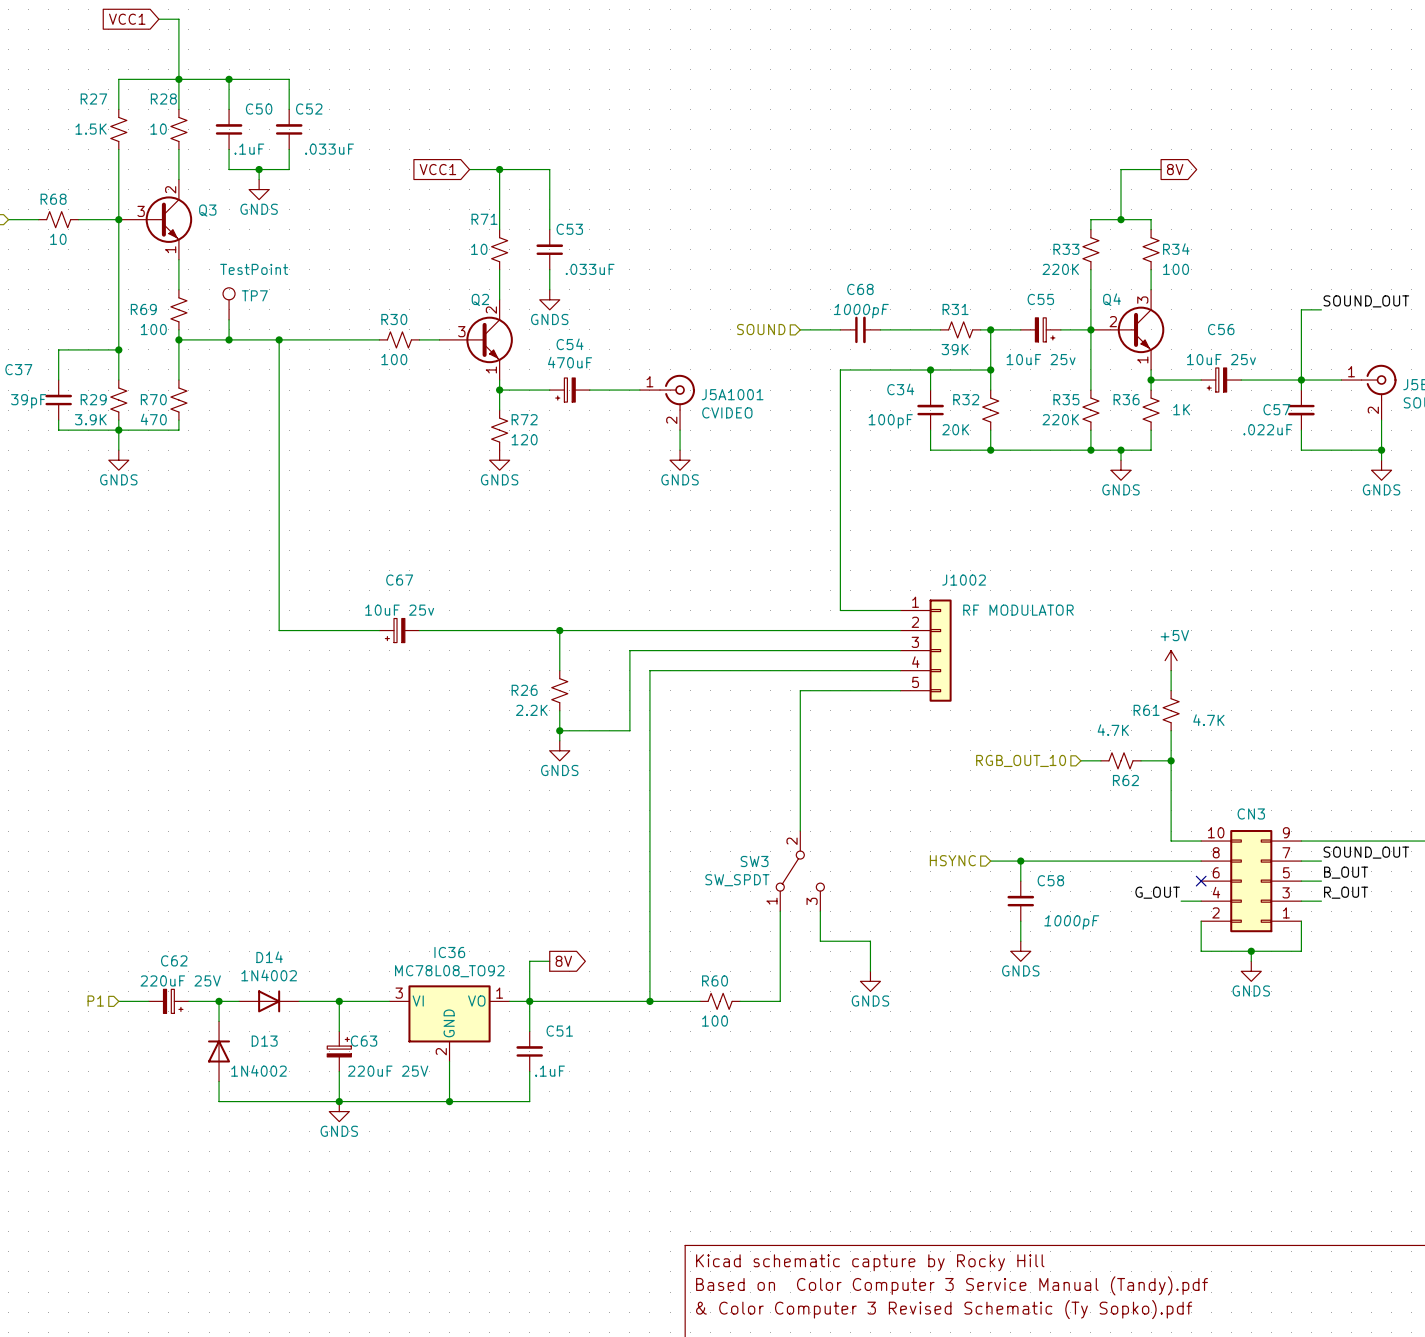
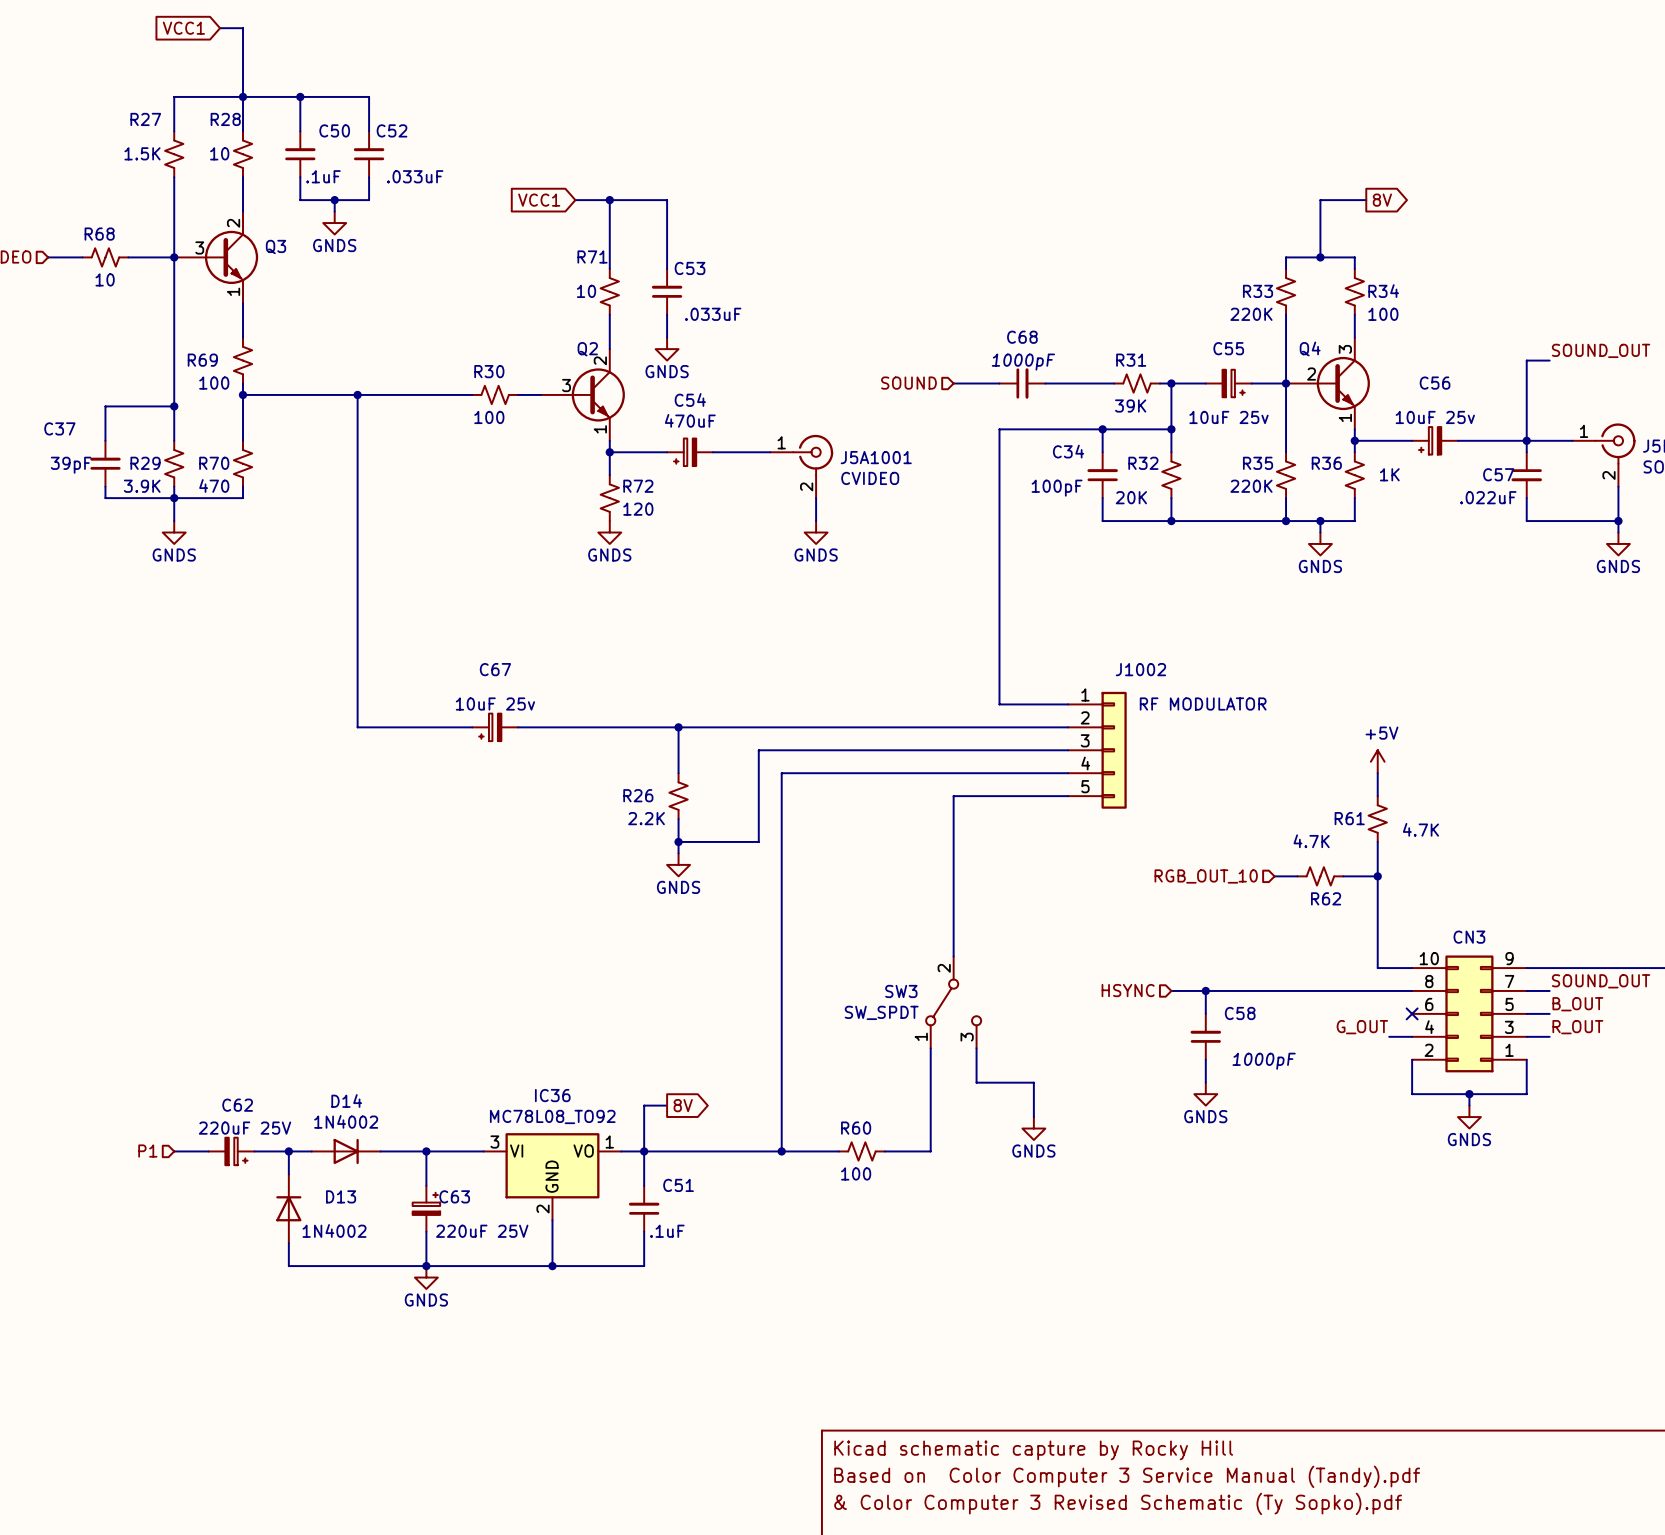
TP7: TestPoint (229, 303) -> none
wire: (229, 319) (229, 339) -> none
junction: (229, 339) -> none

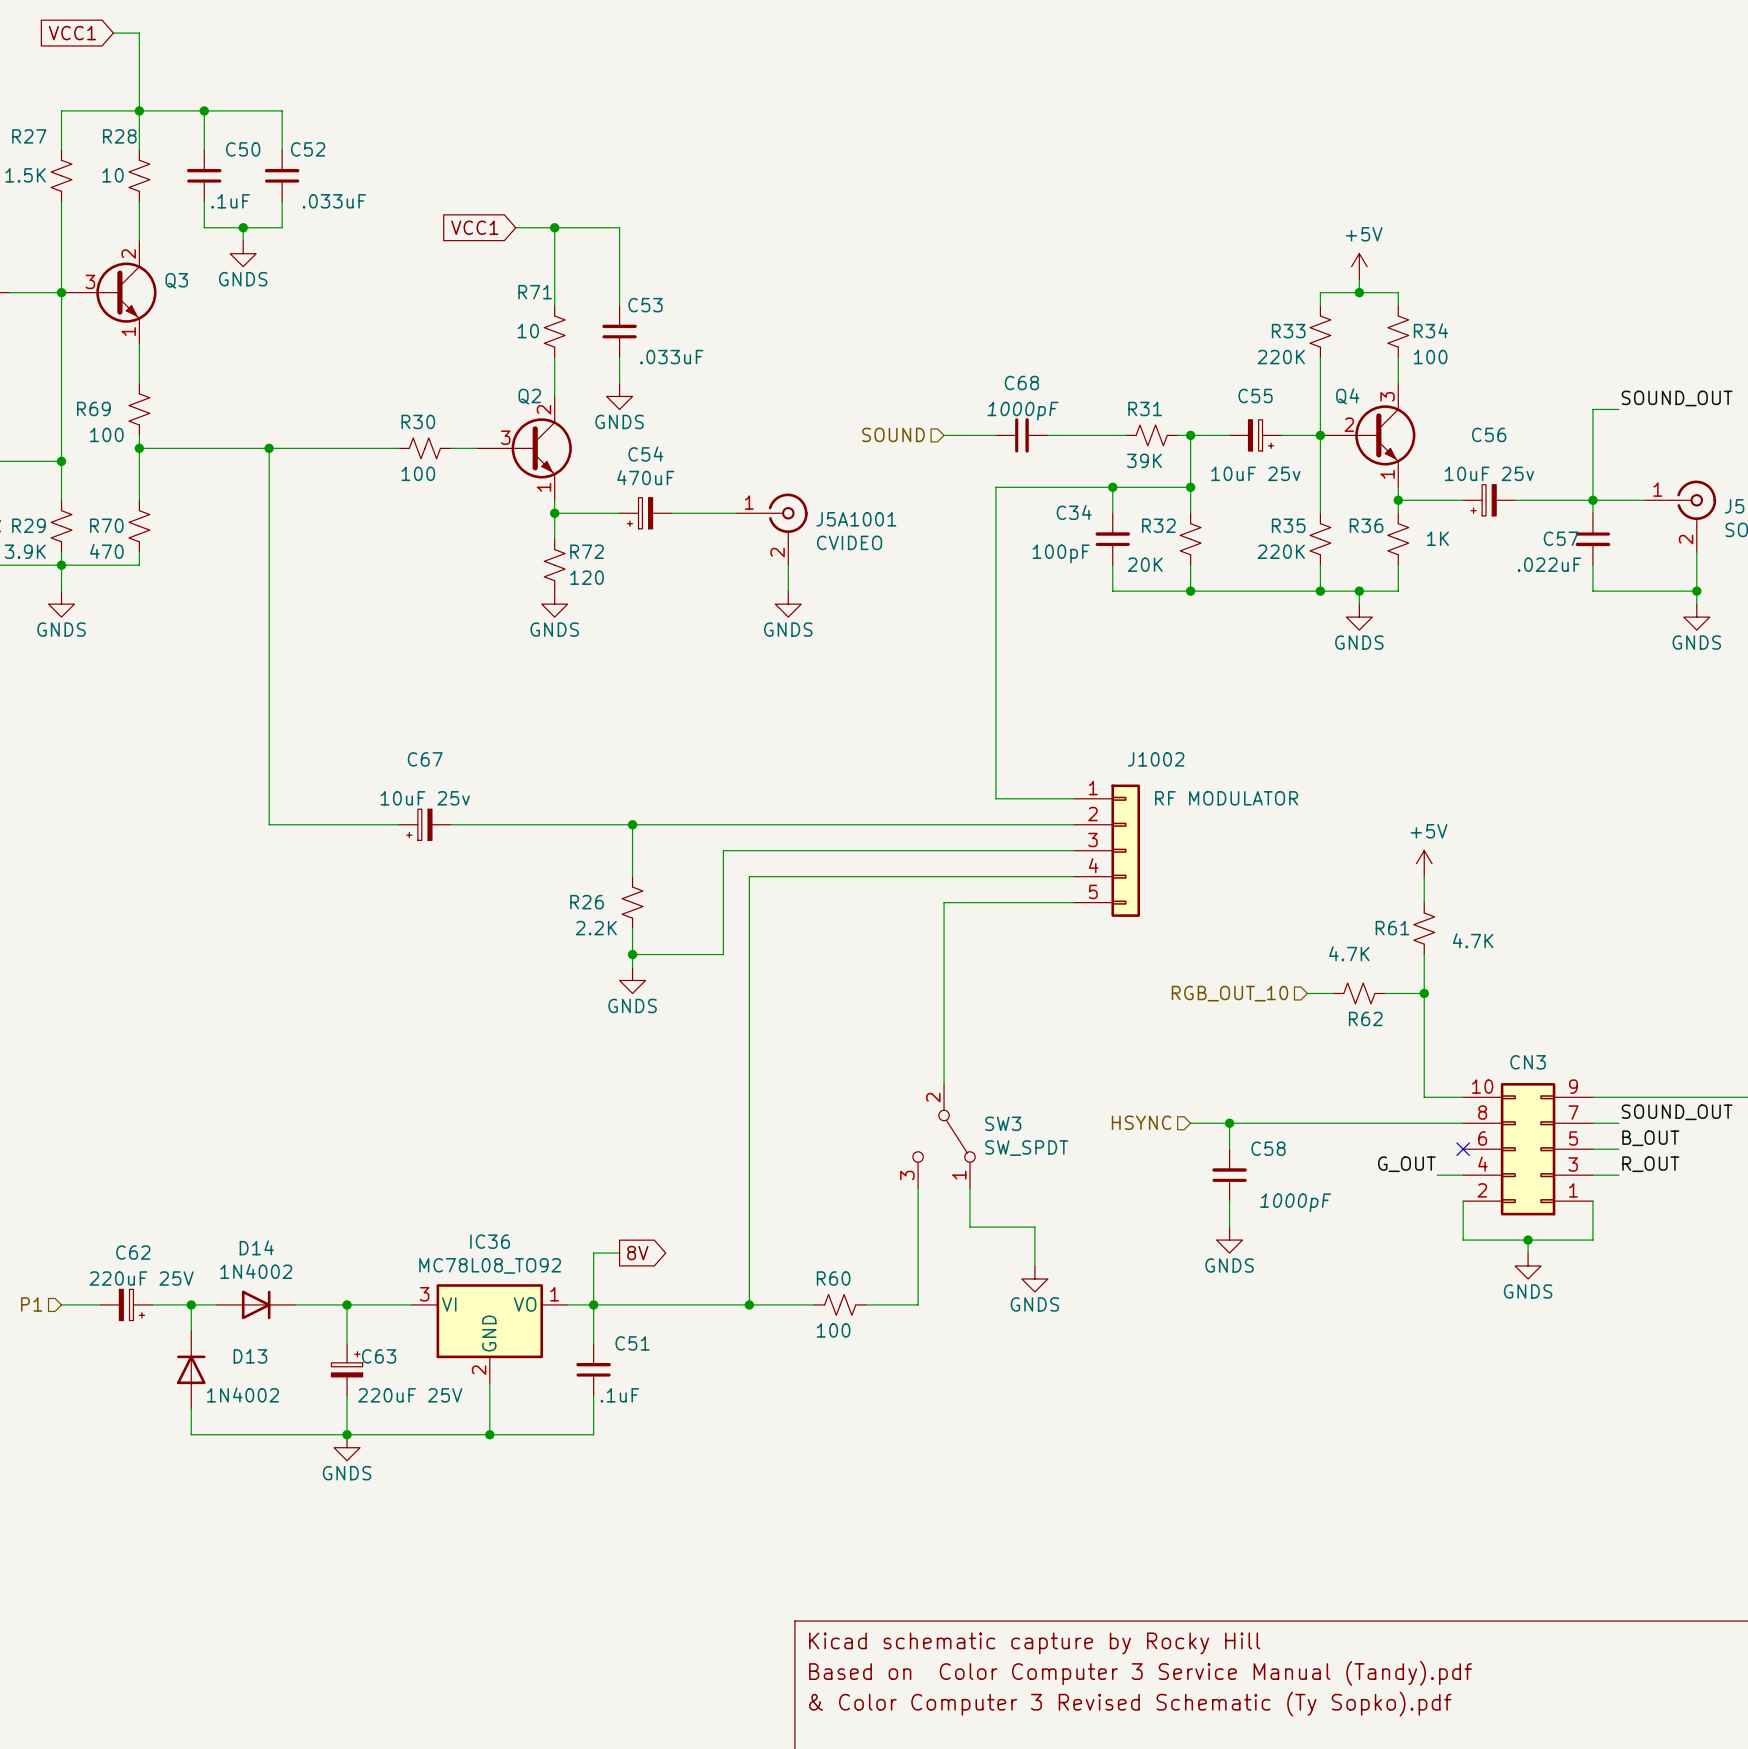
wire: (1366, 200) (1320, 200) (1320, 245) -> none
global label: 8V (1382, 200) -> none
power symbol: none -> +5V (1359, 266)
SW3 flip: as is (953, 1002) -> left-right (944, 1136)

